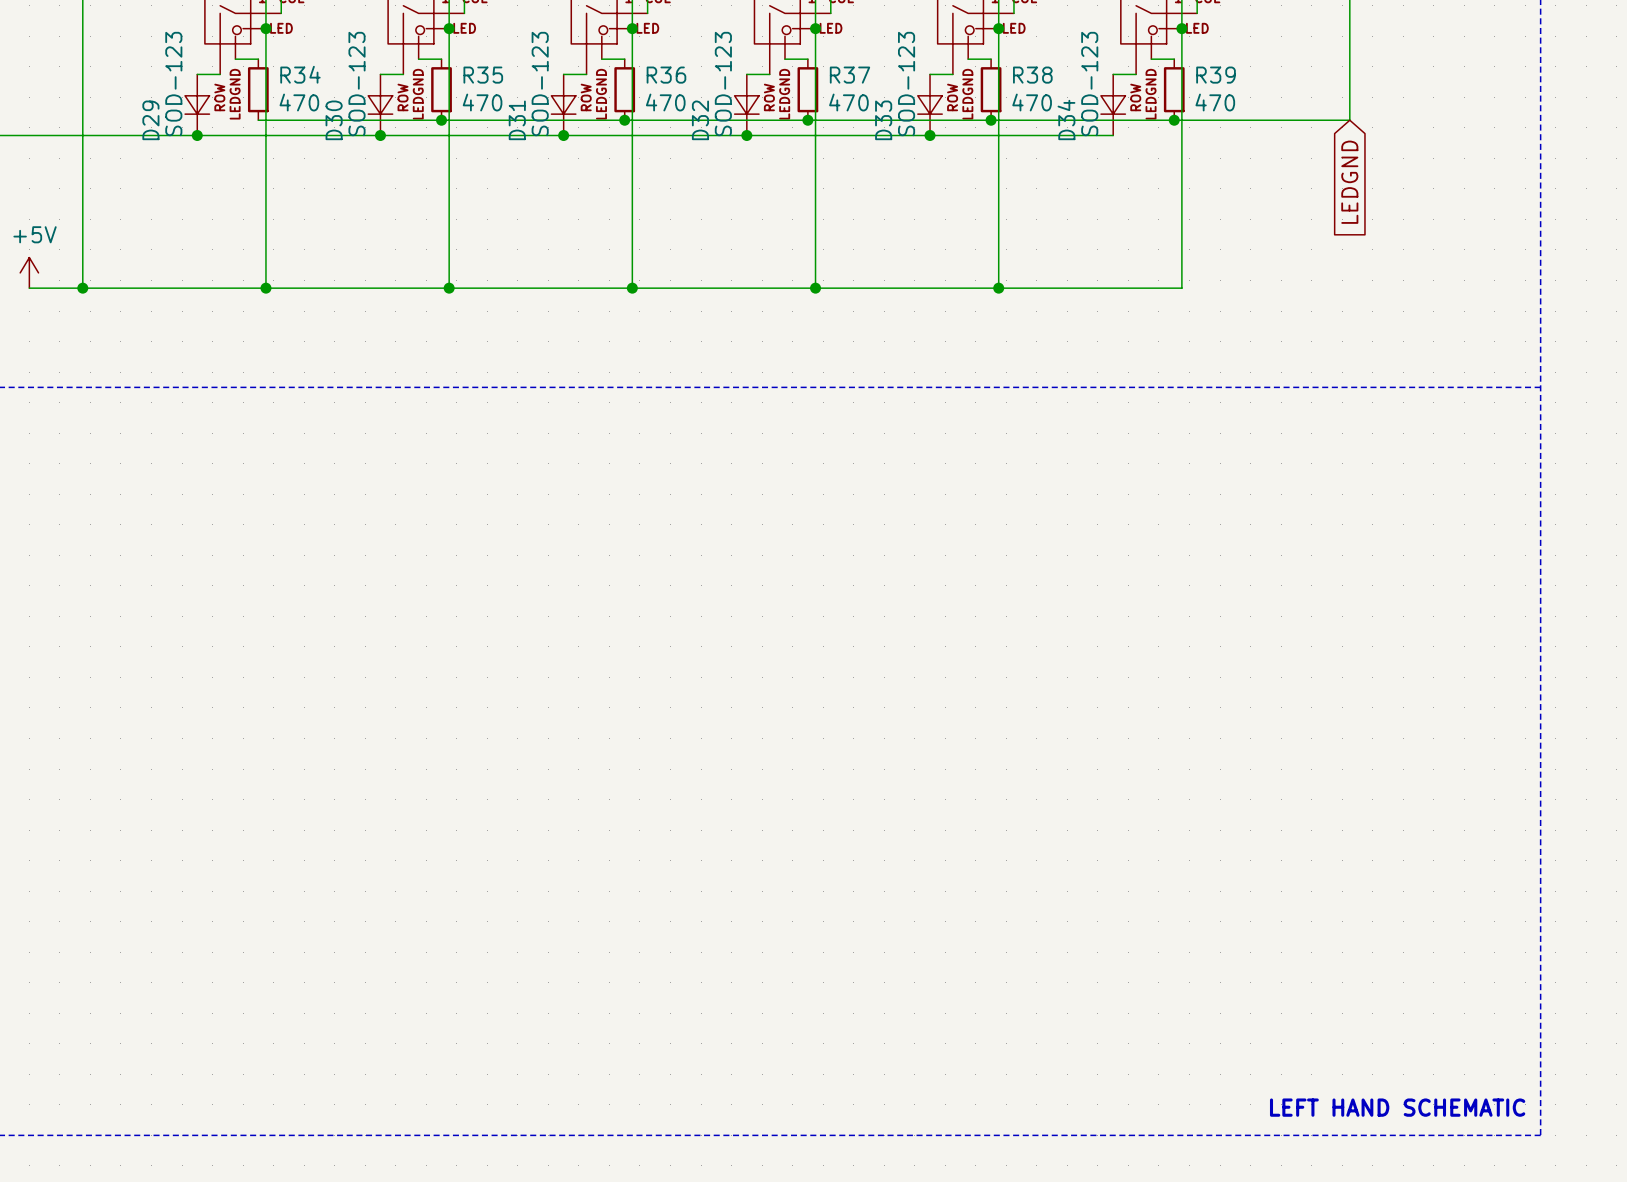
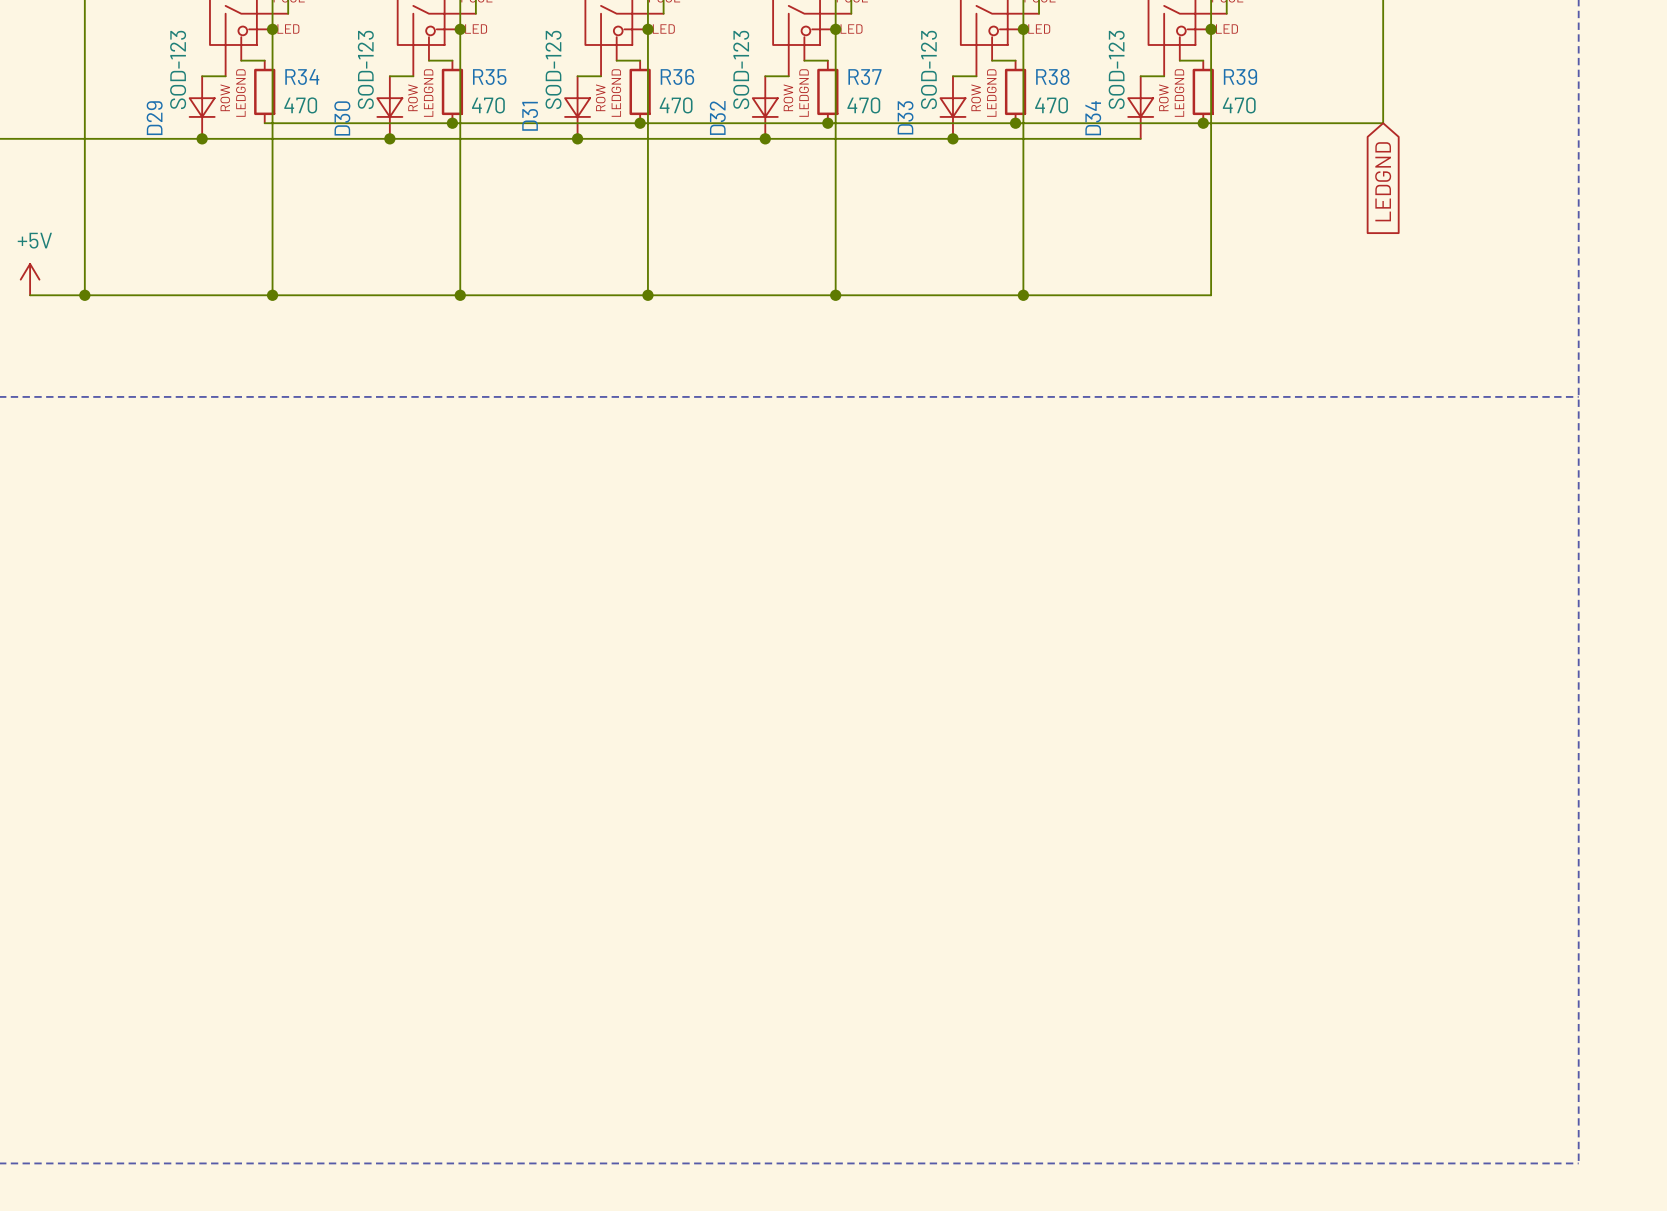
text: LEFT HAND SCHEMATIC (1397, 1107) -> none

